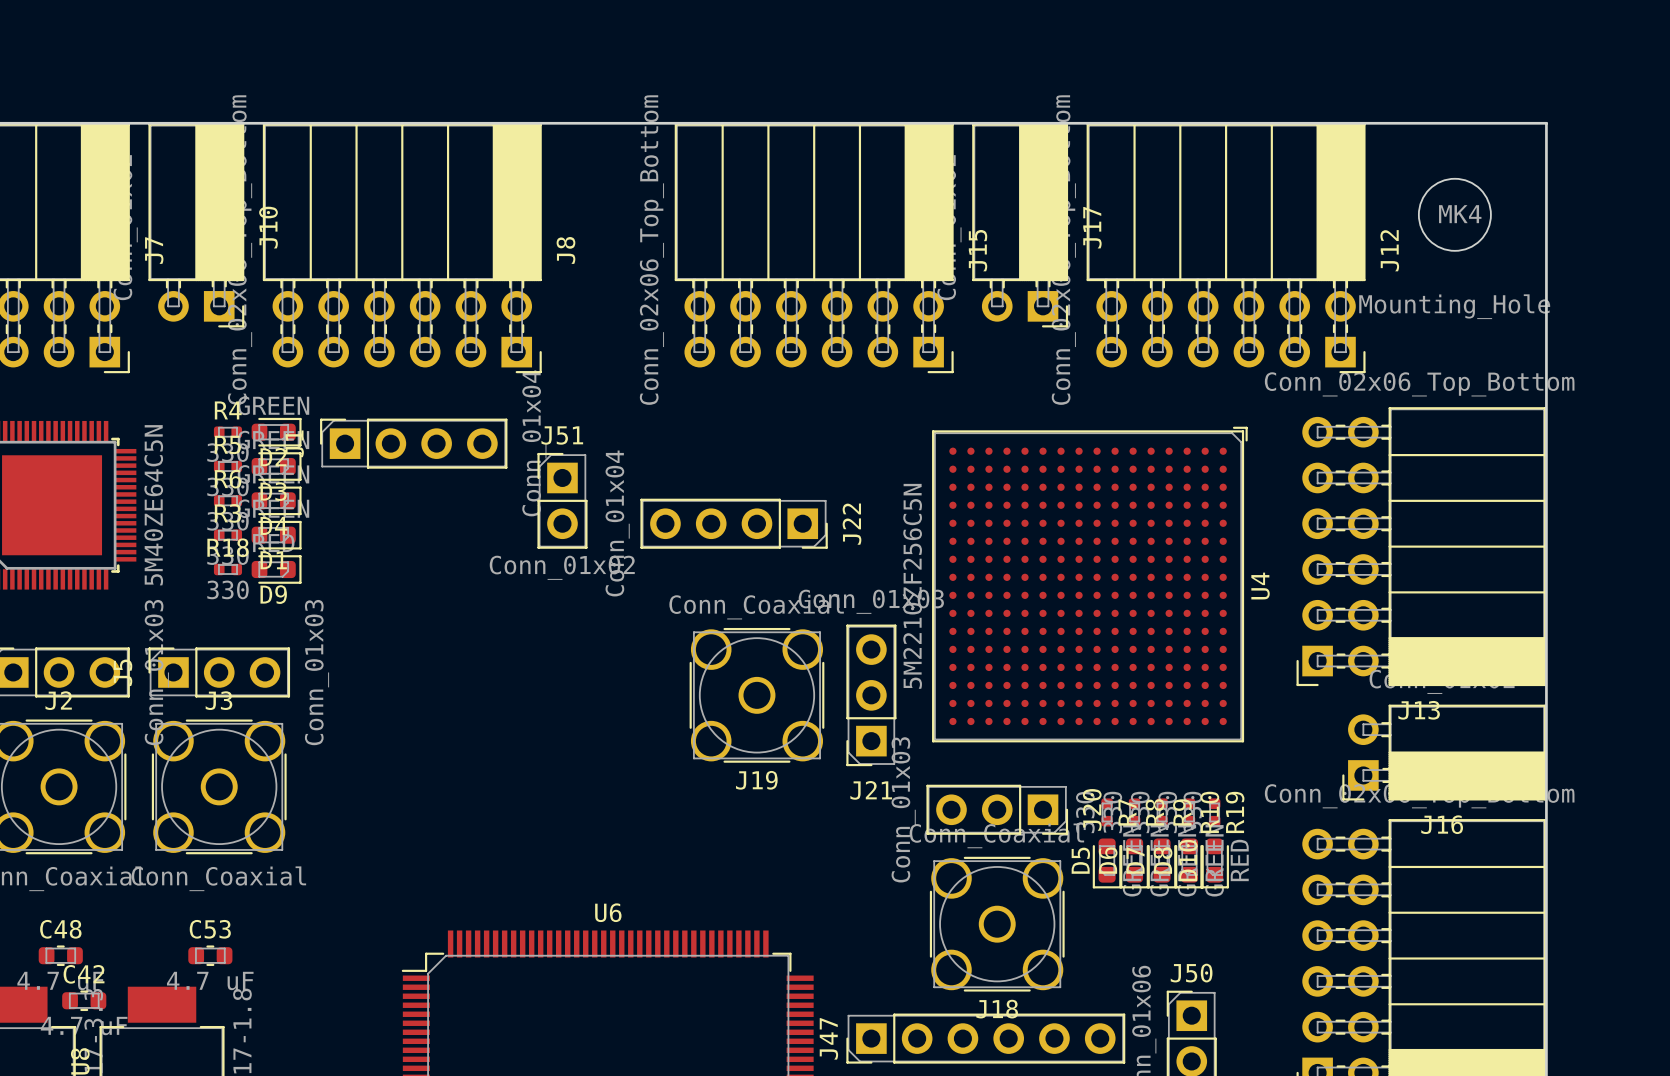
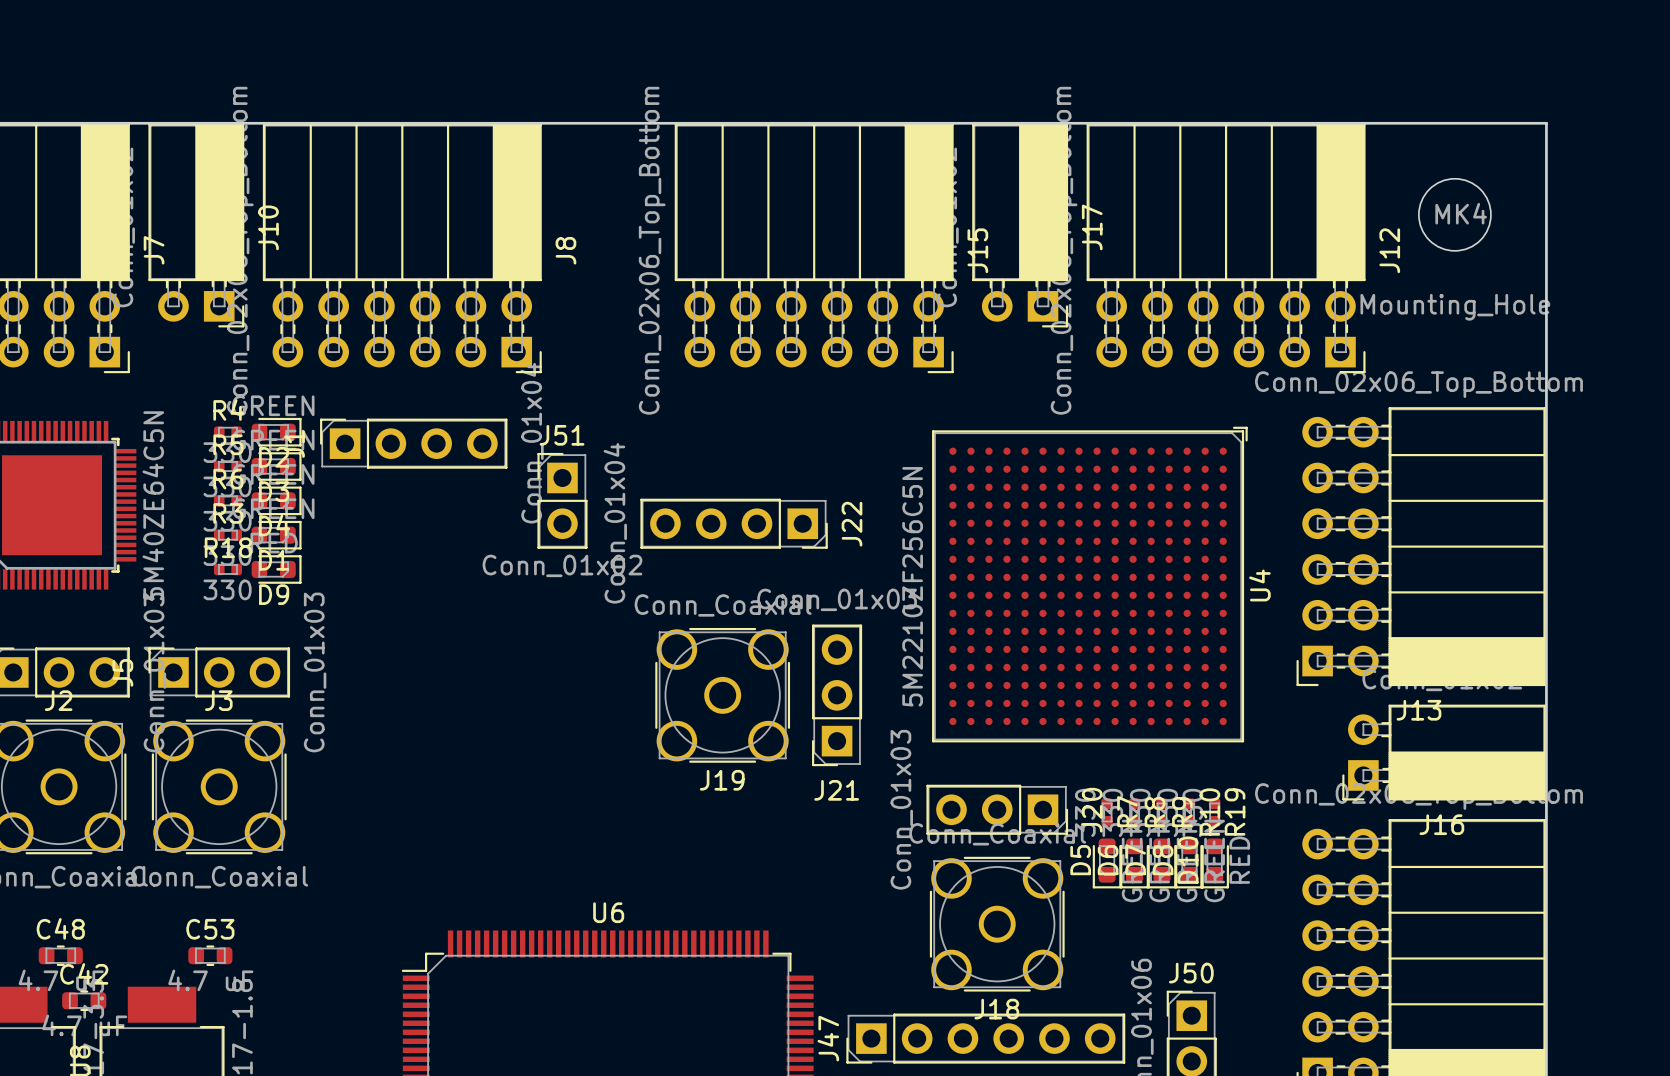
J19 position: (756, 695) -> (722, 695)
J21 position: (871, 695) -> (837, 695)

